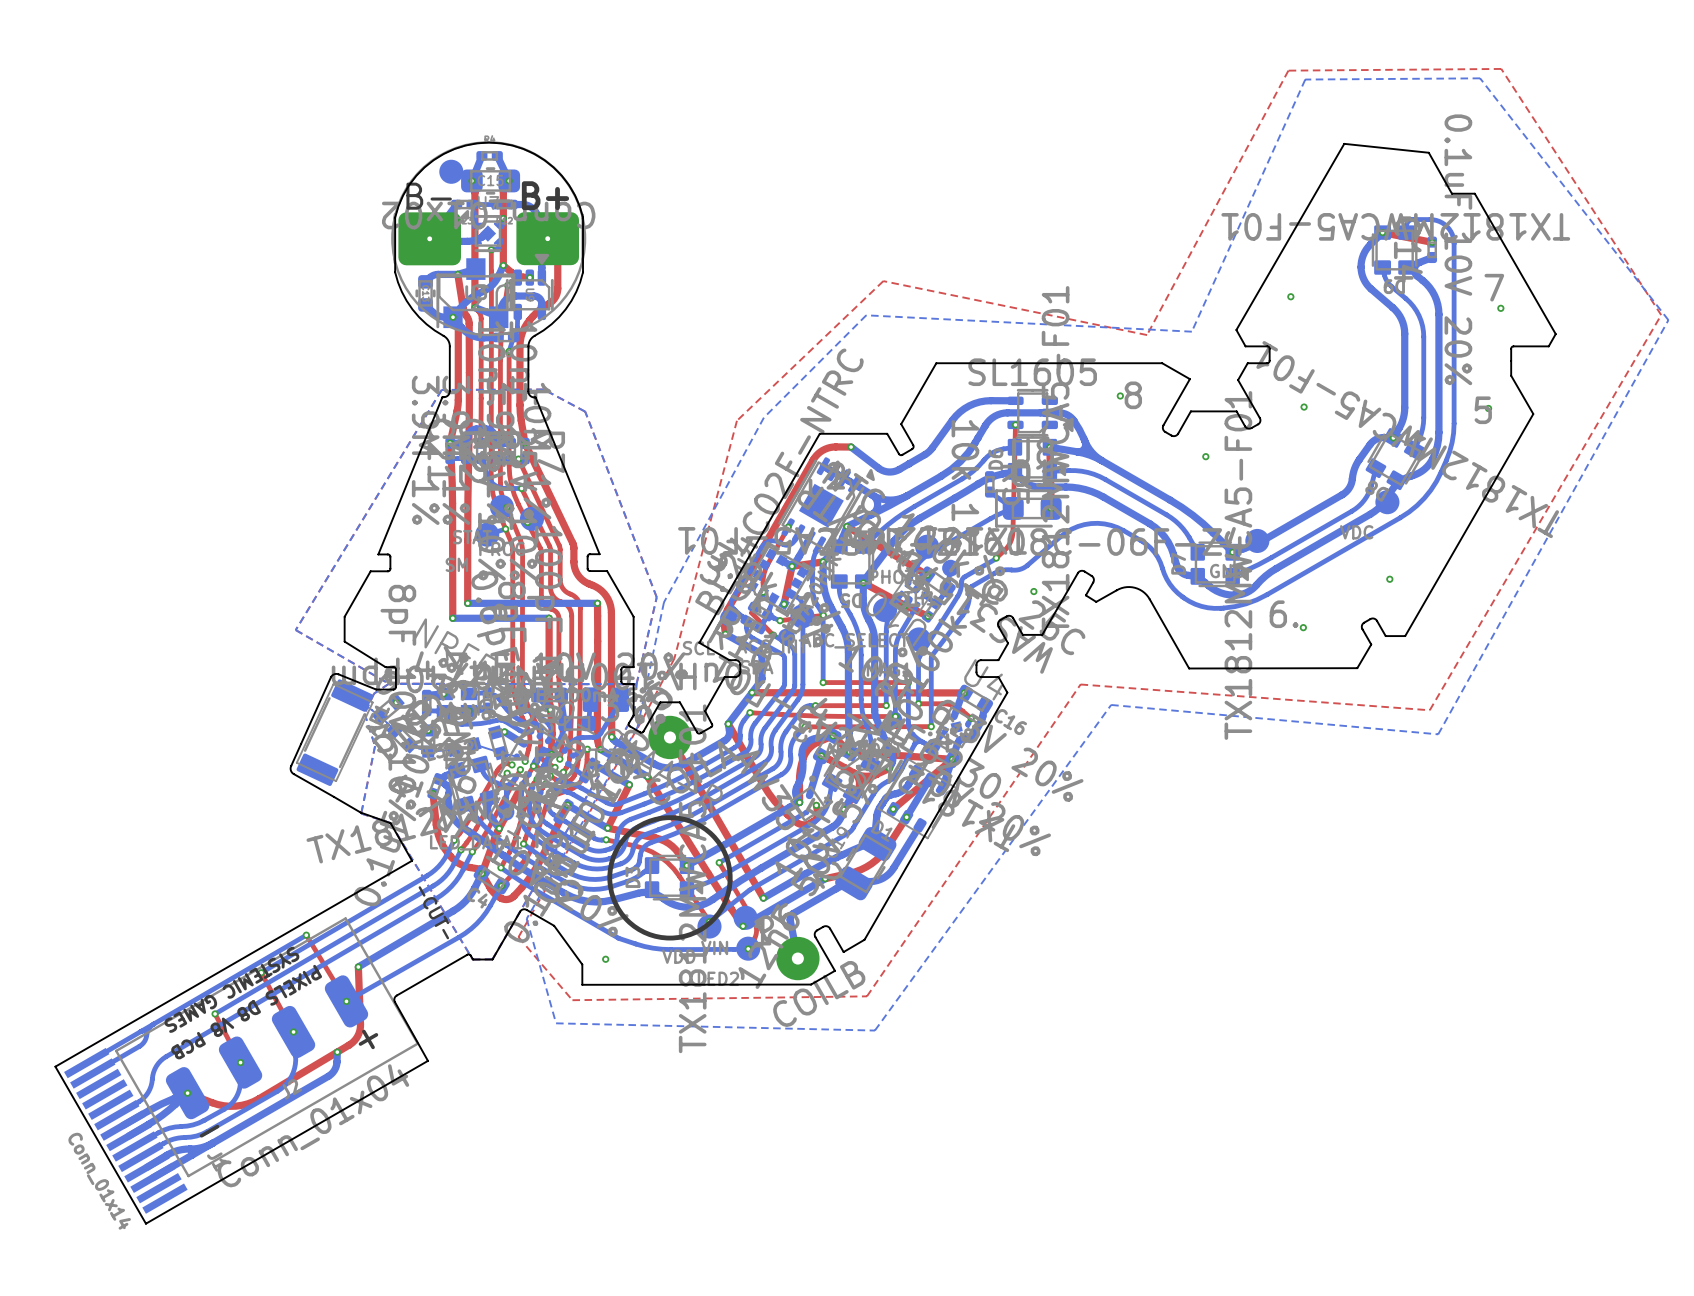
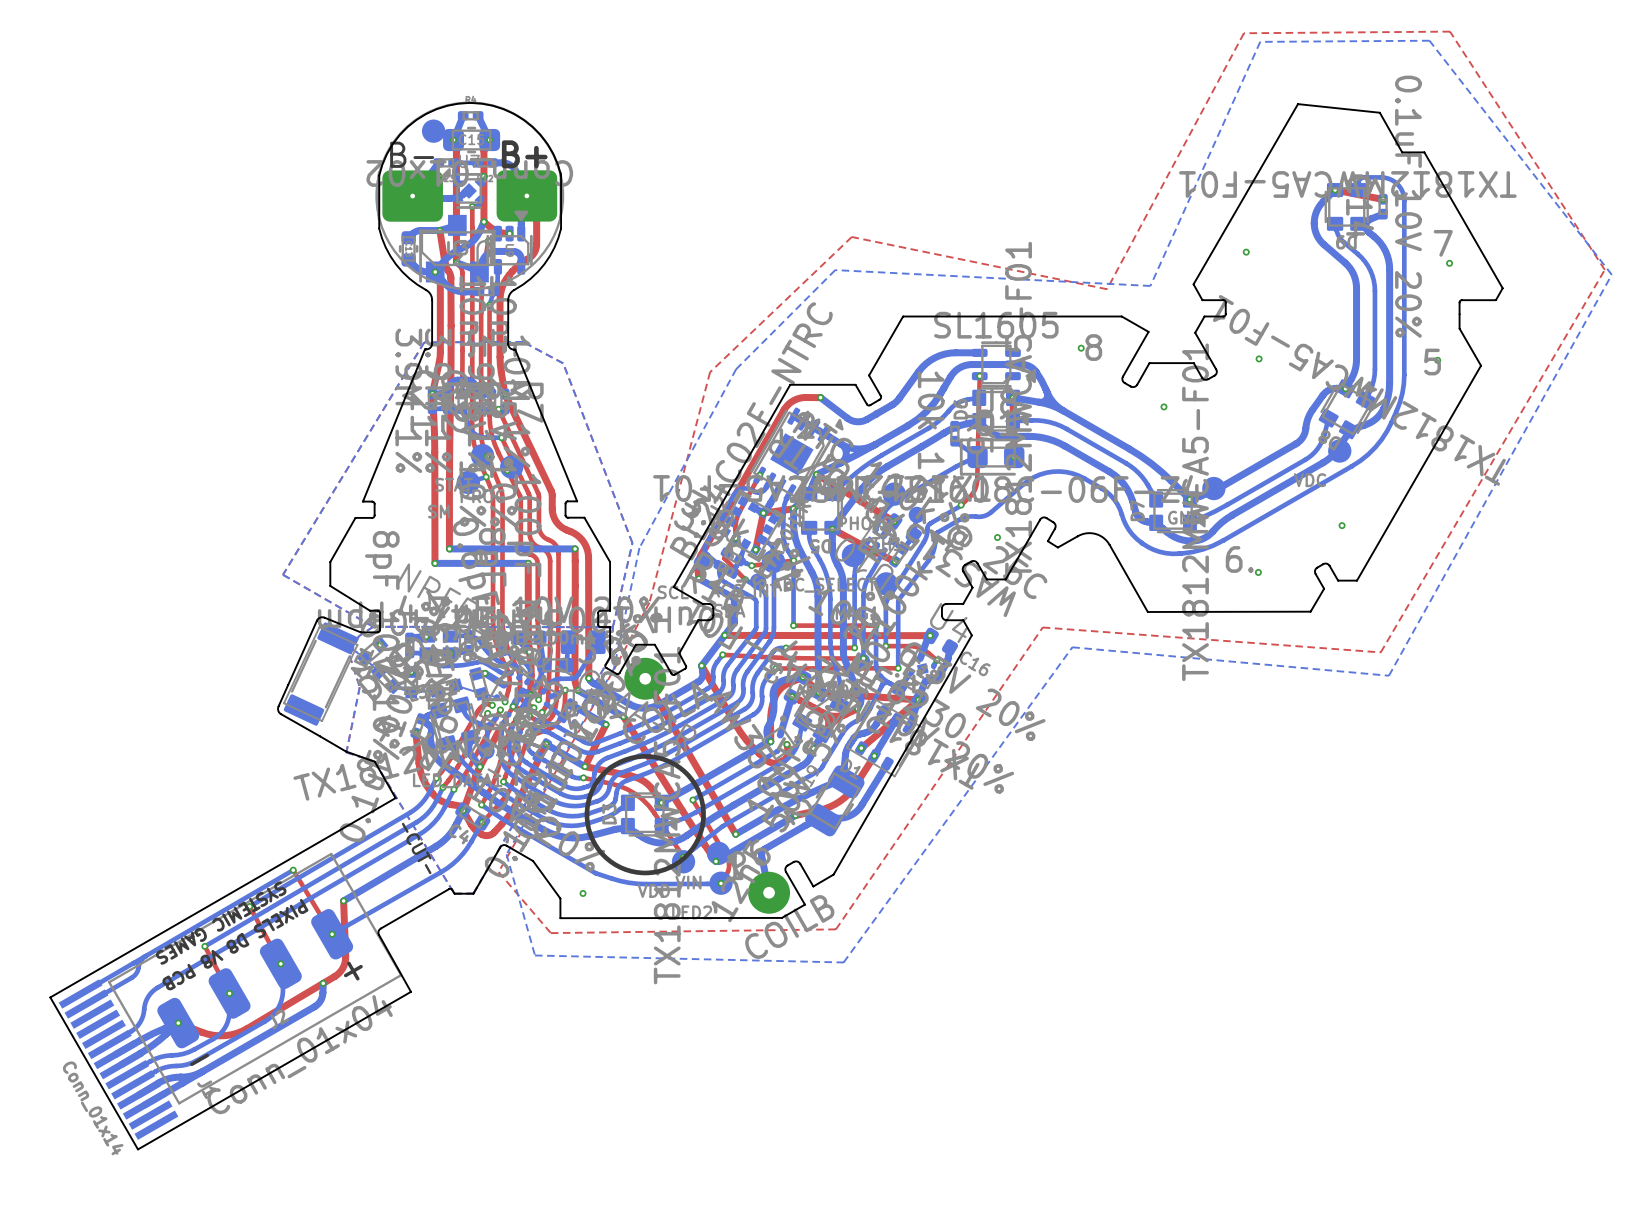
part footprint: [918, 566, 956, 598] -> [886, 513, 922, 544]
C16 footprint: [956, 684, 994, 714] -> [922, 627, 959, 656]

